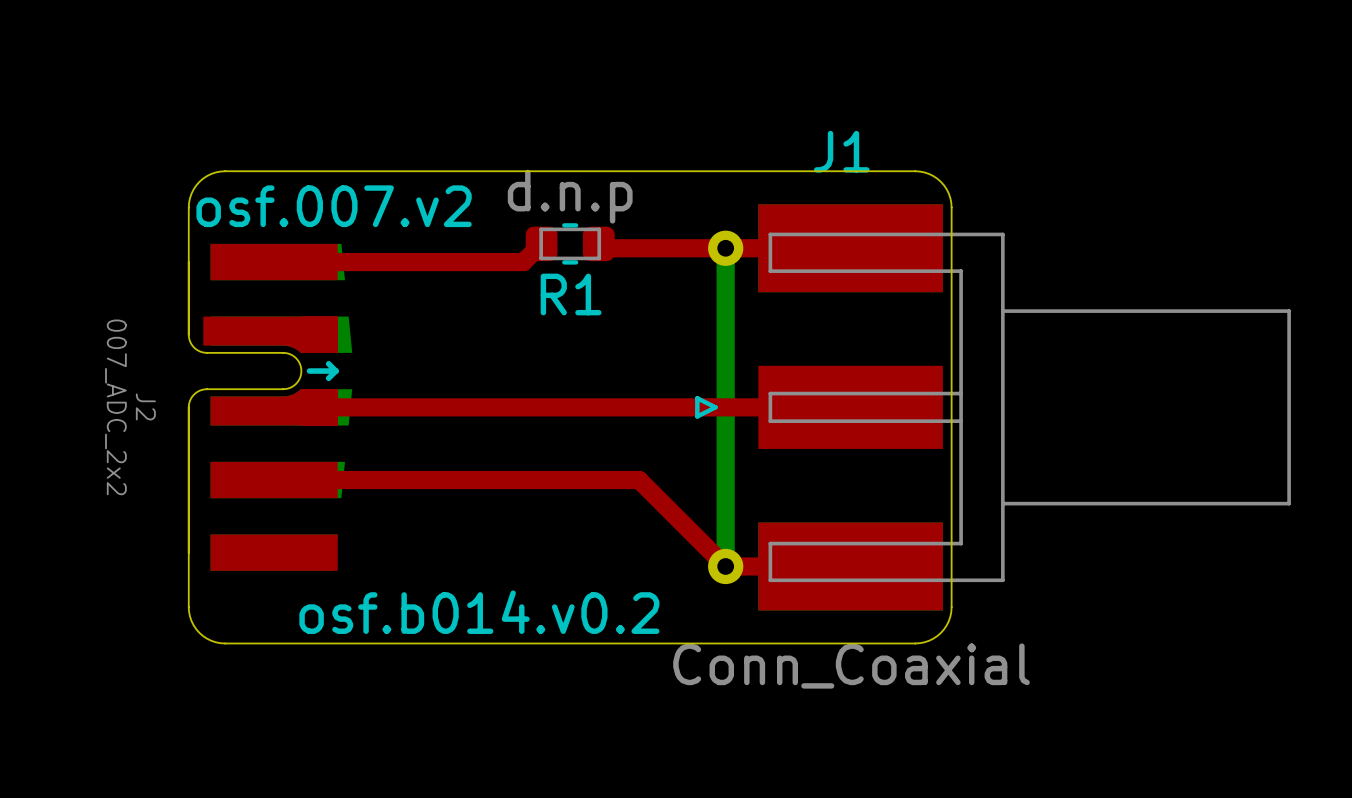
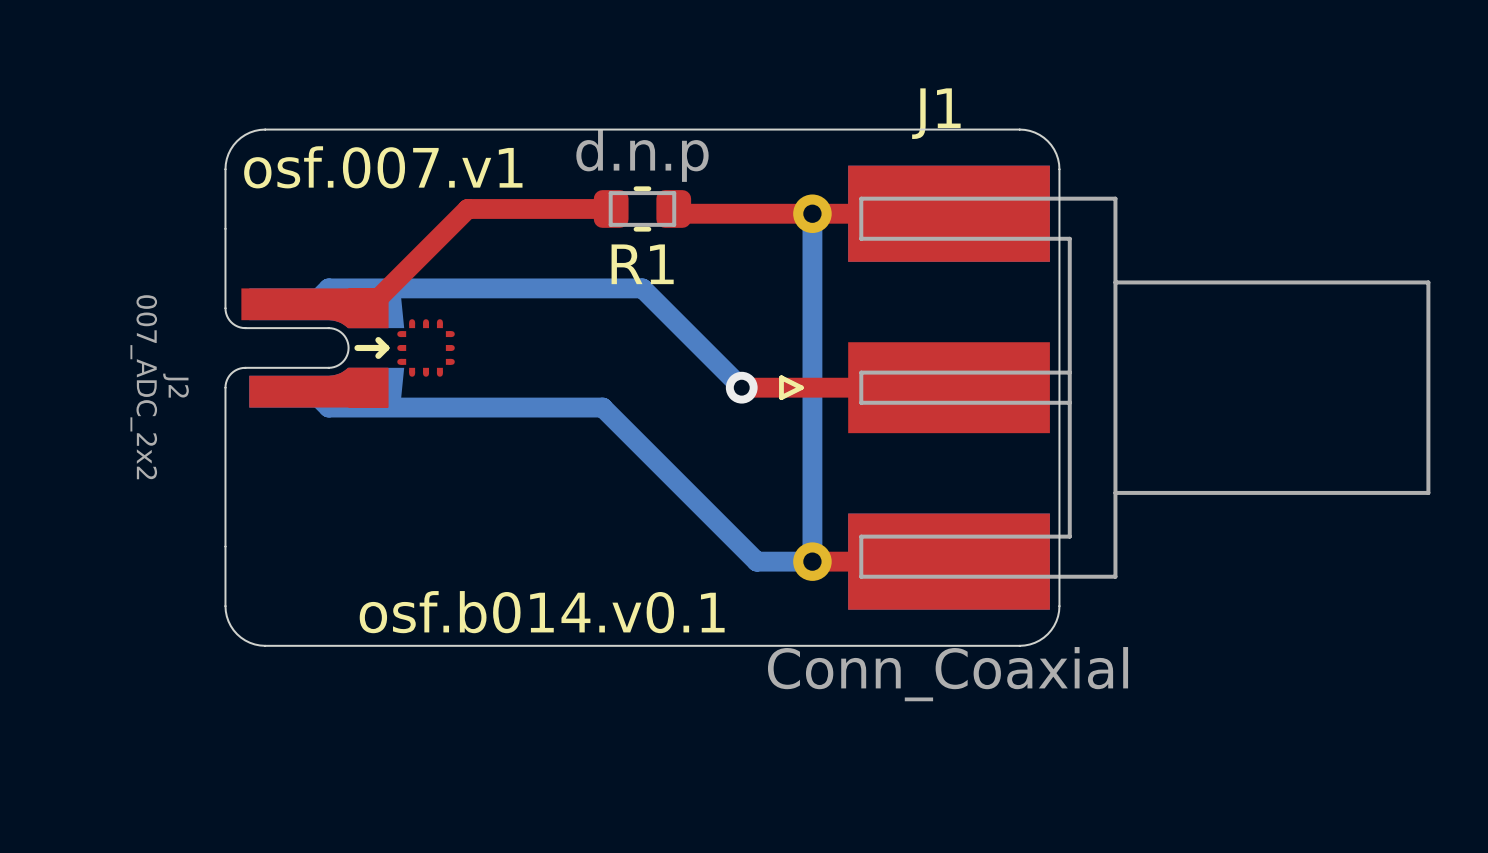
text: osf.007.v2 (334, 206) -> osf.007.v1 (383, 167)
J2 footprint: [187, 243, 353, 571] -> [224, 288, 455, 408]
top track: (541, 243) (523, 262) (274, 262) -> (611, 208) (467, 208) (368, 308)
bottom track: none -> (308, 308) (328, 288) (642, 288) (741, 387)
bottom track: none -> (308, 387) (328, 407) (602, 407) (756, 561) (812, 561)
top track: (319, 407) (661, 407) -> none
via: none -> (741, 387)
top track: (274, 480) (639, 480) (725, 566) -> none
text: osf.b014.v0.2 (479, 612) -> osf.b014.v0.1 (542, 612)

